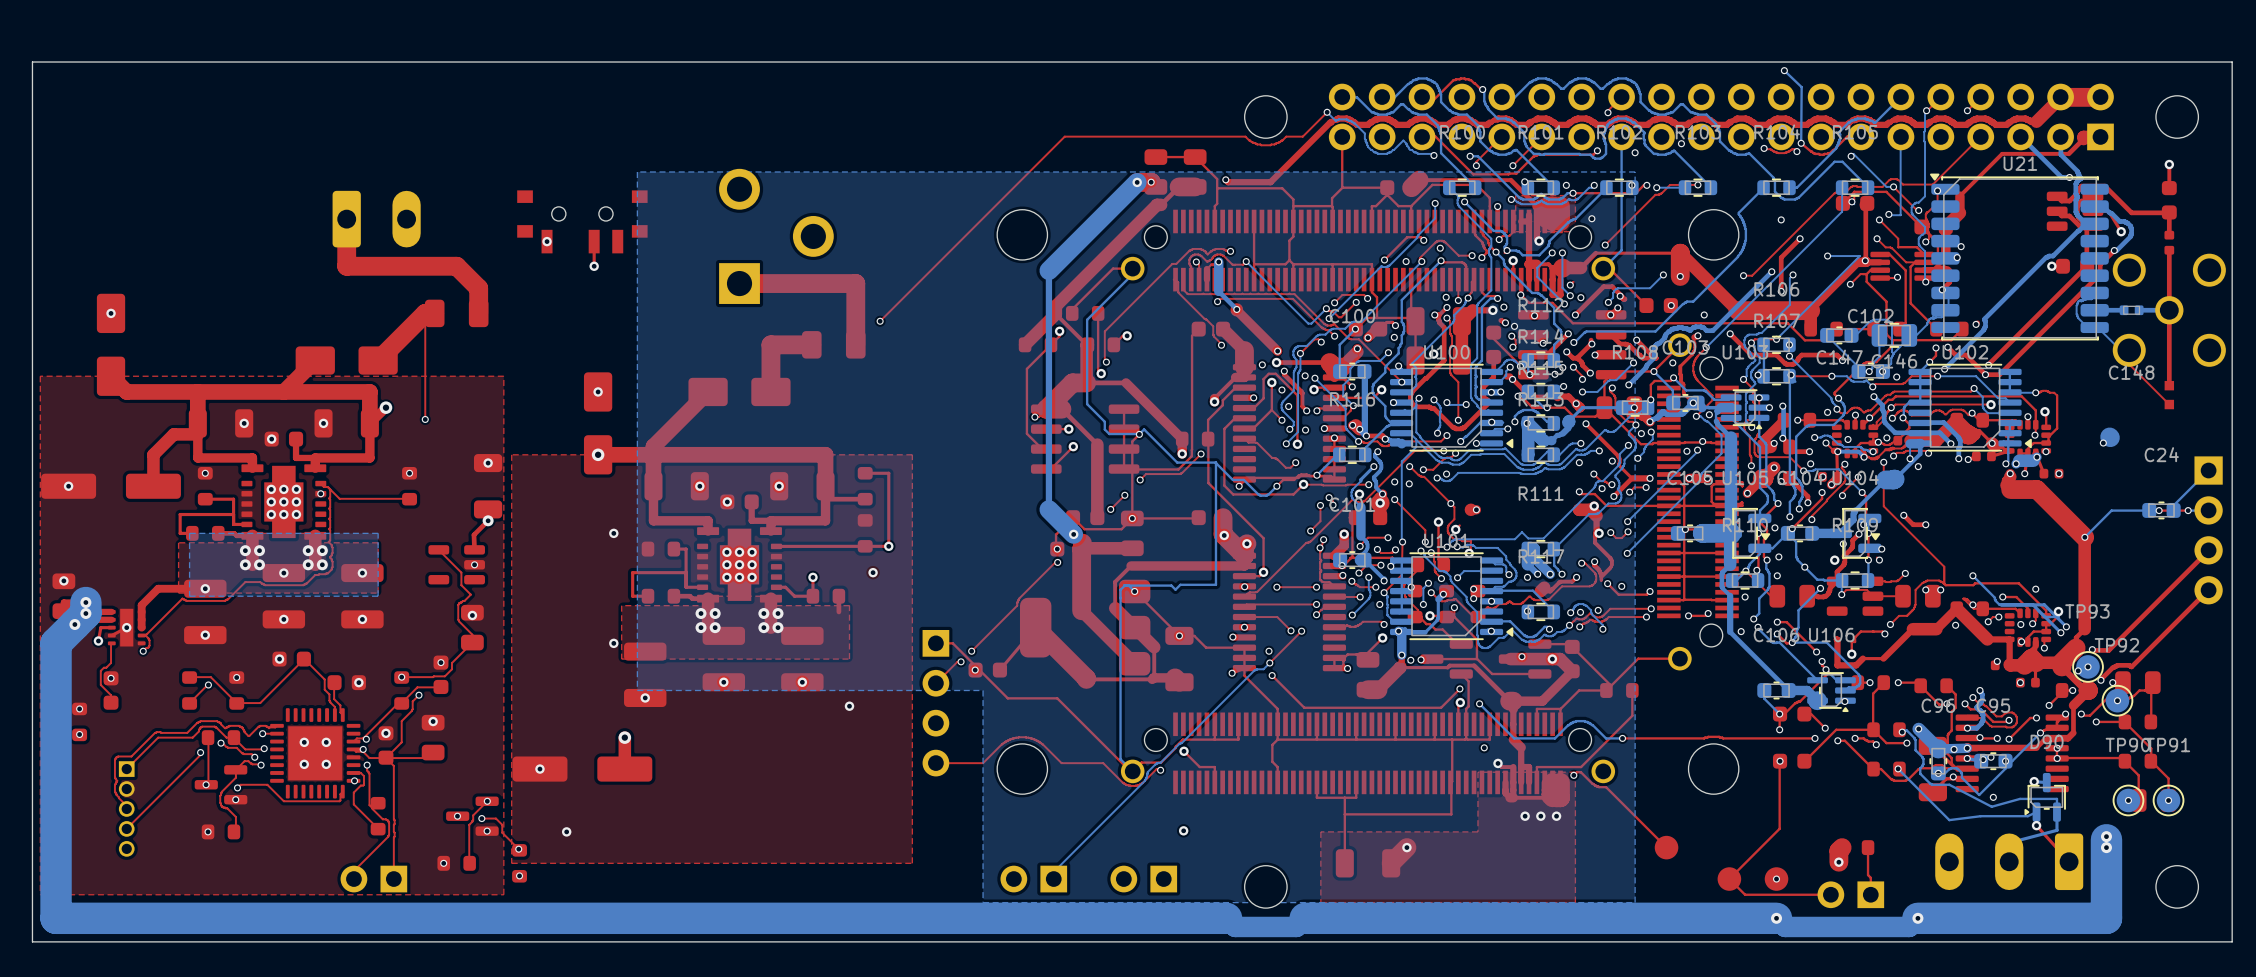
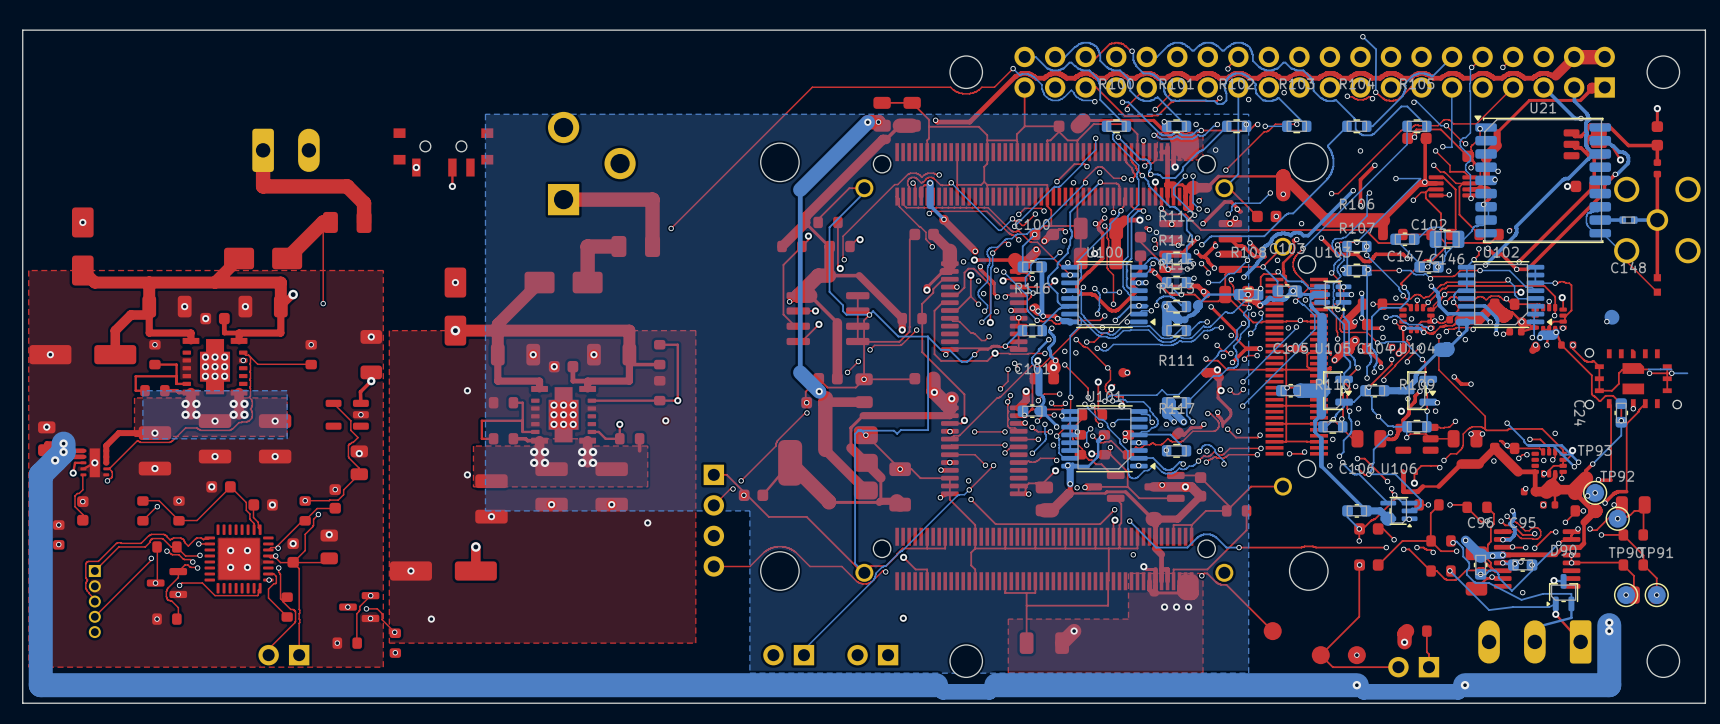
C24 name position: C24 (2161, 454) -> C24 (1579, 413)
bottom track: (2208, 470) (2173, 505) (2173, 510) -> none
top track: none -> (1561, 345) (1591, 375) (1591, 394) (1593, 396) (1600, 400) (1605, 395) (1613, 395) (1621, 403) (1621, 420)
top track: none -> (1572, 345) (1572, 348) (1584, 360) (1593, 360) (1599, 366) (1599, 390) (1611, 390) (1618, 383) (1618, 373) (1622, 369) (1648, 369)
top track: (2006, 480) (2006, 485) (2010, 489) (2036, 489) (2084, 537) (2084, 629) -> none
top track: none -> (1671, 369) (1667, 366) (1667, 390)
bottom track: none -> (1671, 369) (1648, 369)
bottom track: (2159, 510) (2111, 510) (2084, 537) -> none
C24 rotation: 0° (2161, 510) -> 90° clockwise (1621, 412)
C24 position: (2161, 510) -> (1621, 412)
part: none -> (1633, 378)
part: (2208, 530) -> none
via: (2084, 537) -> none
top track: (2208, 550) (2108, 650) -> (1609, 403) (1611, 405) (1611, 480)
via: none -> (1633, 408)
bottom track: none -> (1621, 420) (1621, 435) (1592, 464)
via: none -> (1621, 420)
top track: (2208, 590) (2131, 666) (2129, 665) -> (1645, 403) (1626, 423) (1626, 491)
via: none -> (1592, 464)

